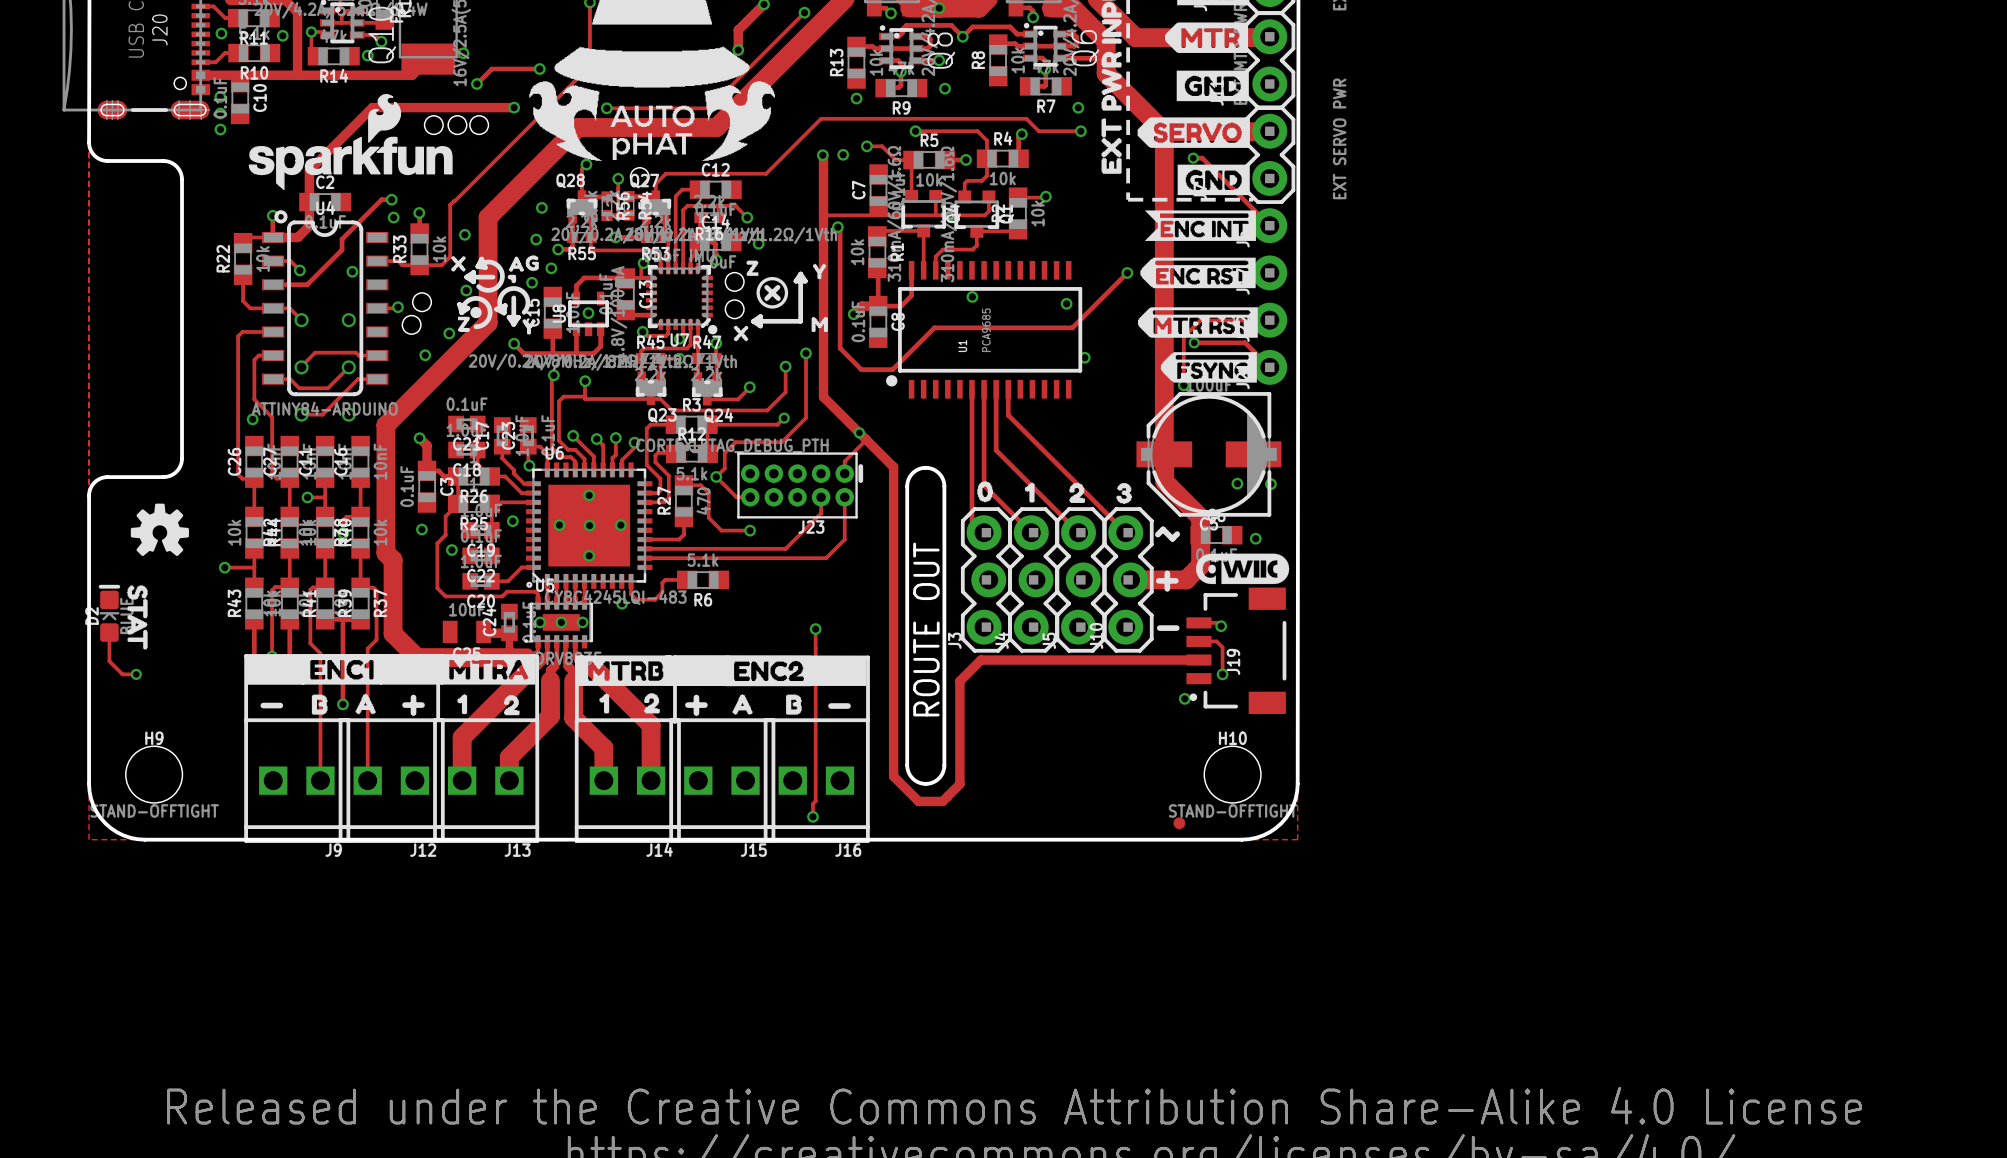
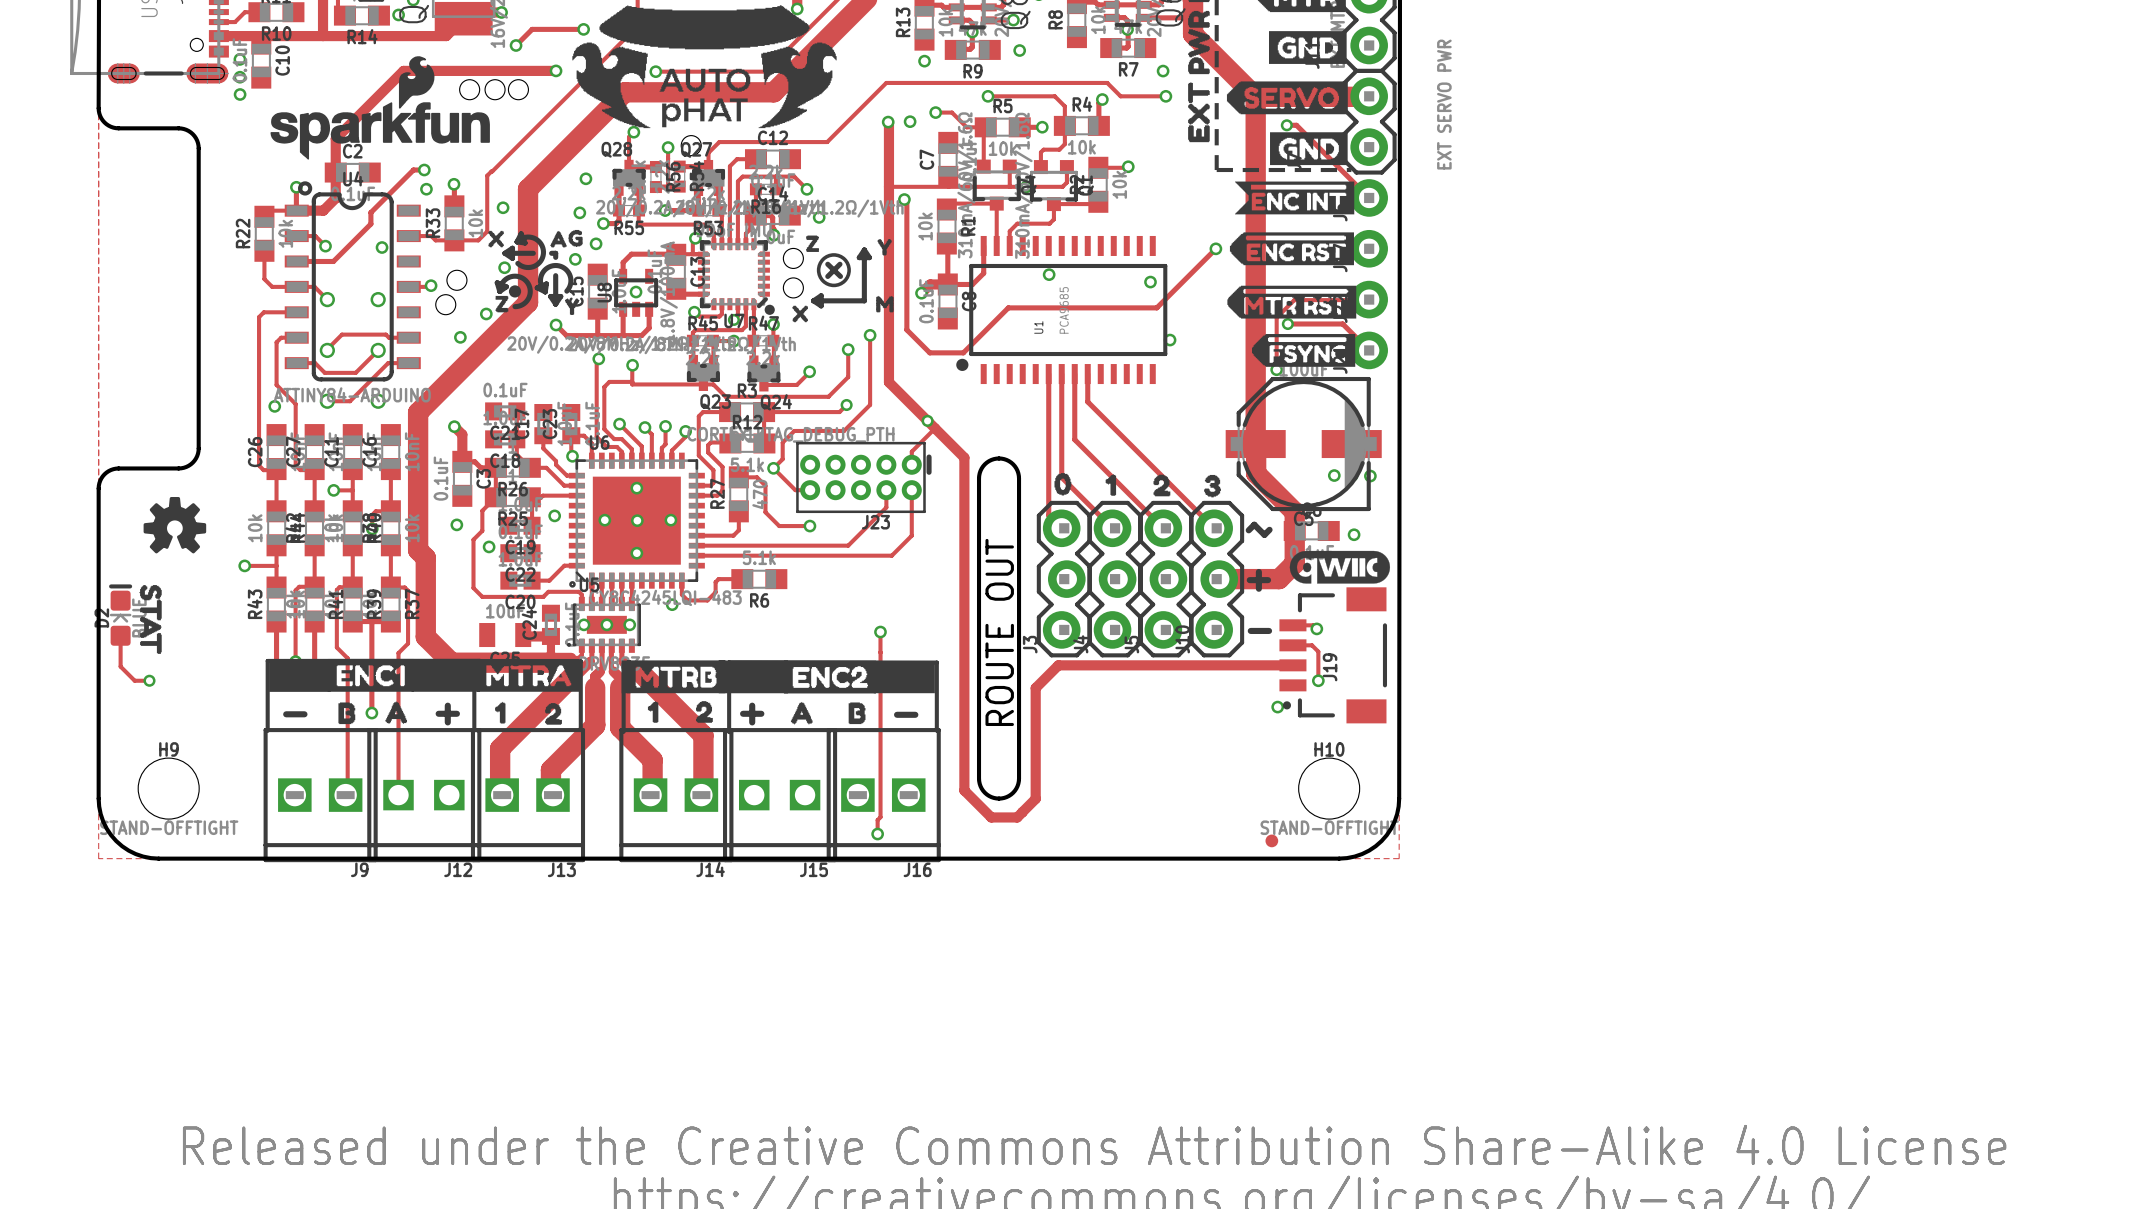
J9 footprint: [244, 718, 351, 843] -> [263, 728, 378, 863]
J13 footprint: [433, 718, 540, 843] -> [470, 728, 586, 863]
J14 footprint: [574, 718, 681, 843] -> [619, 728, 734, 863]
J16 footprint: [763, 718, 870, 843] -> [826, 728, 941, 863]

